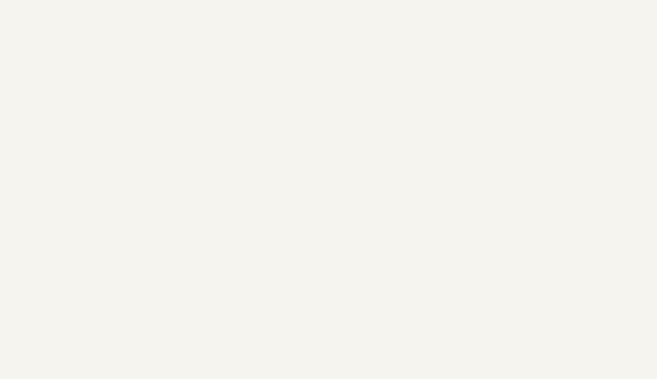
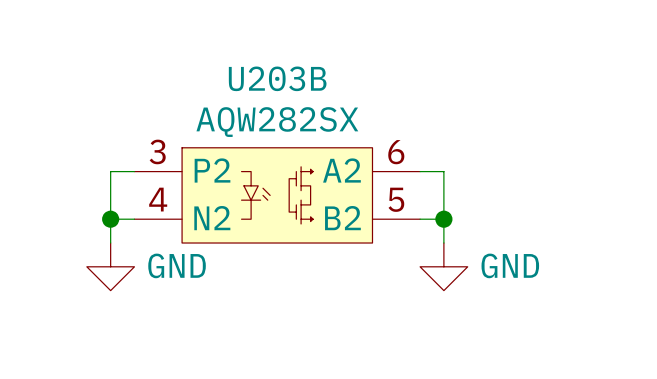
wire: none -> (134, 171) (110, 171) (110, 243)
wire: none -> (420, 171) (443, 171) (443, 243)
U203B: none -> AQW282SX (277, 195)
wire: none -> (110, 219) (134, 219)
junction: none -> (110, 219)
wire: none -> (420, 219) (443, 219)
junction: none -> (443, 219)
power symbol: none -> GND (110, 266)
power symbol: none -> GND (443, 266)

